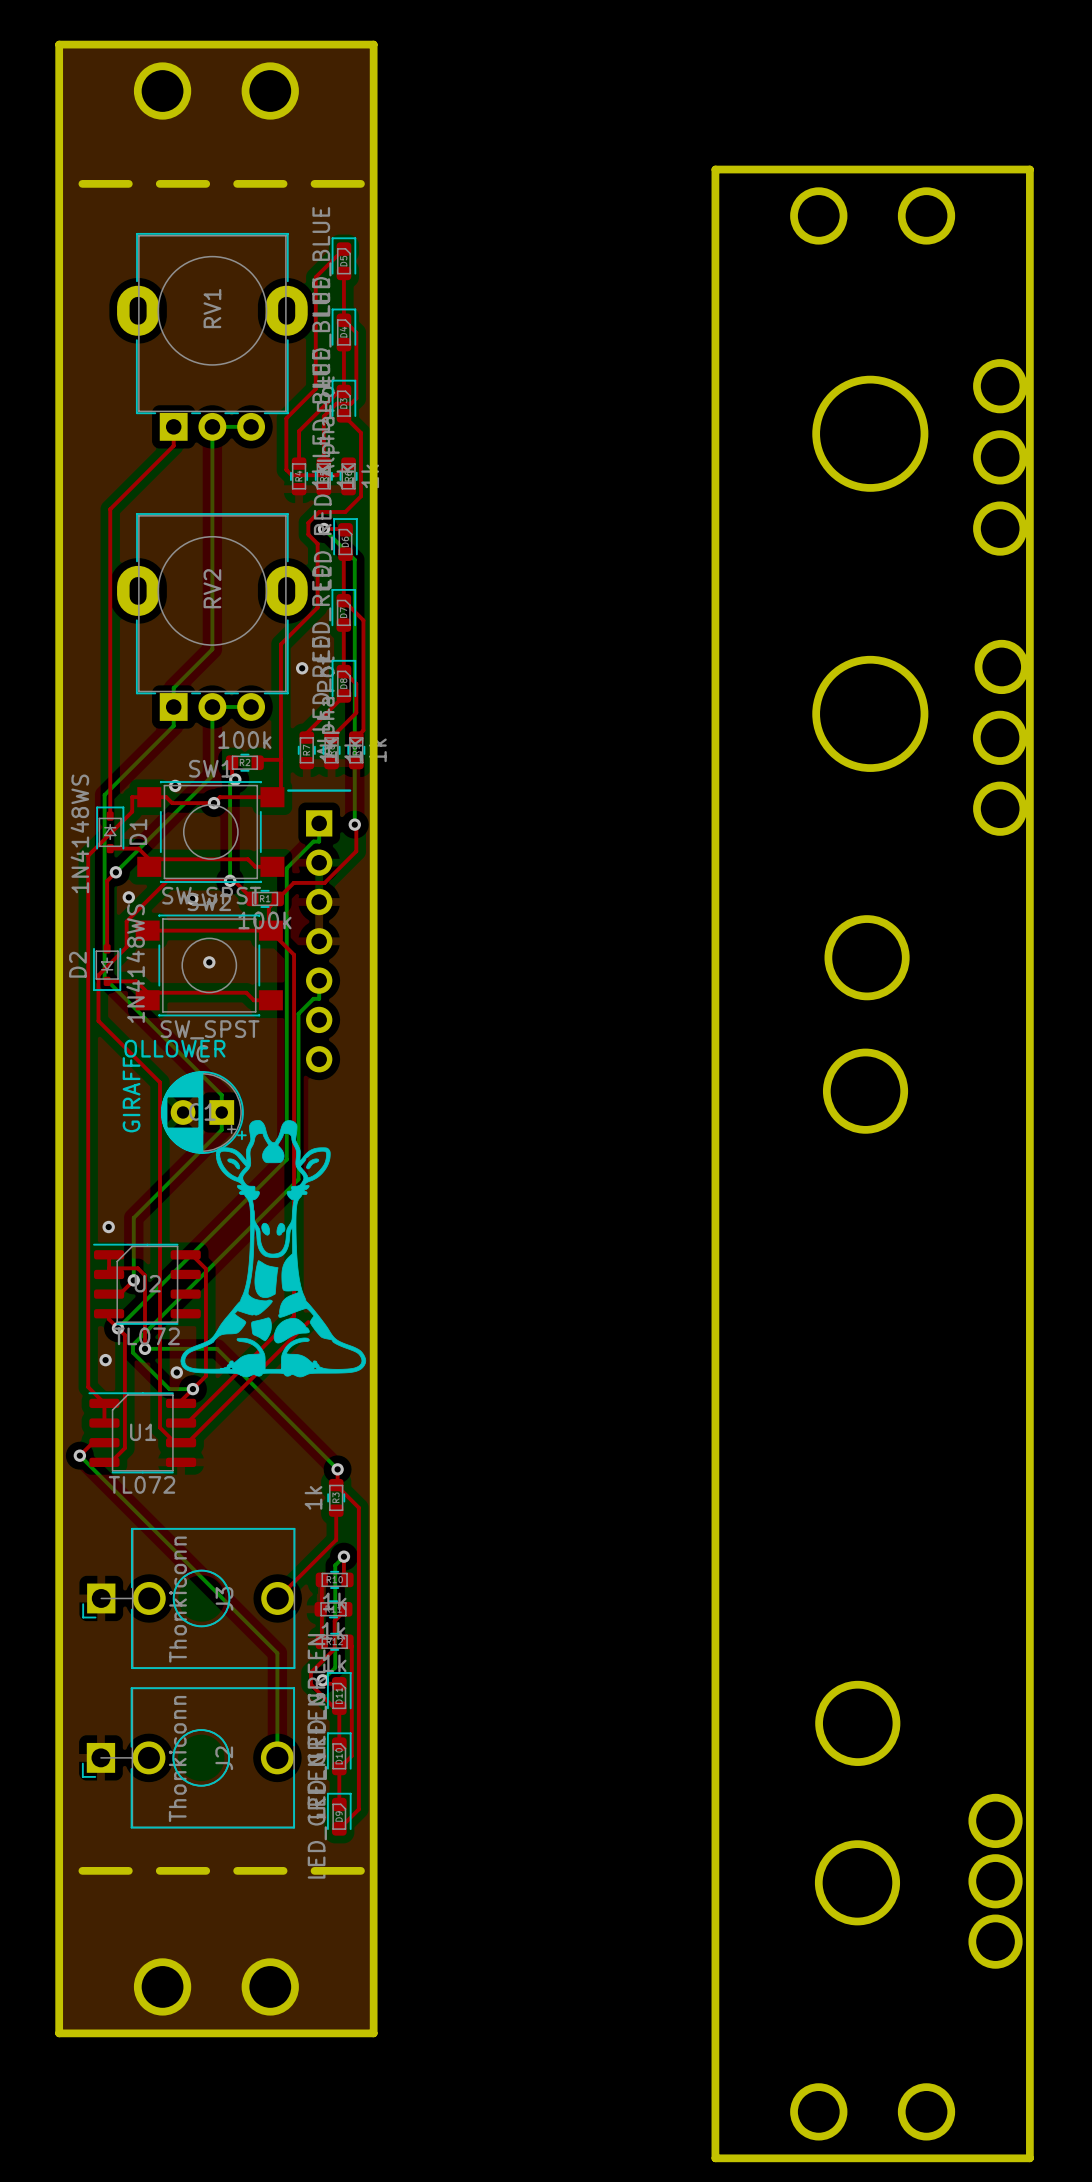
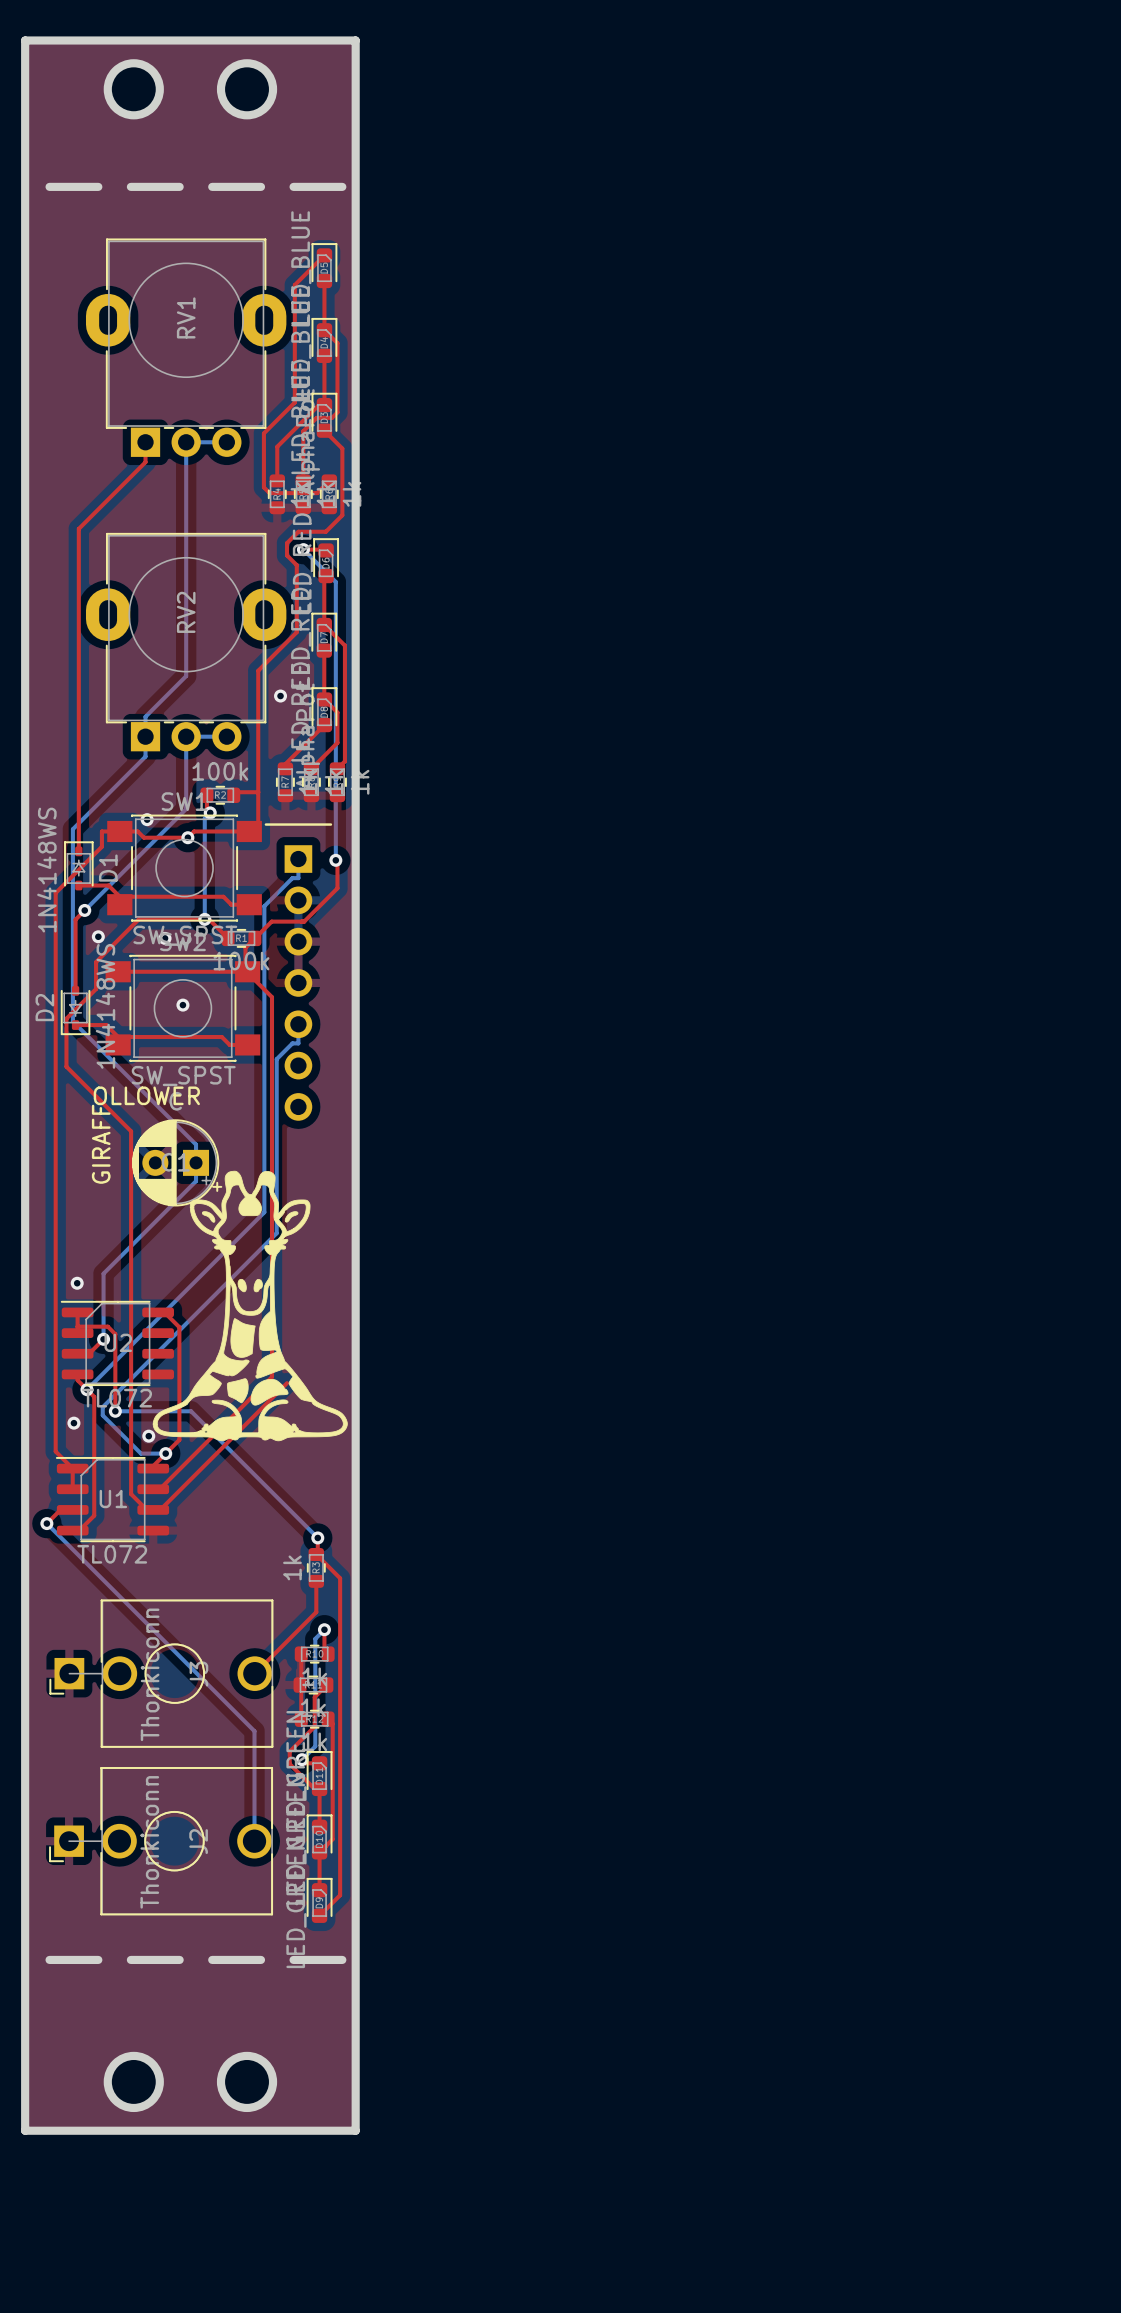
board edge: (715, 169) (1029, 169) (1029, 2158) (715, 2158) (715, 169) -> none
round board edge: [790, 187, 848, 245] -> none
round board edge: [897, 187, 956, 245] -> none
round board edge: [973, 359, 1028, 414] -> none
round board edge: [812, 375, 929, 492] -> none
round board edge: [973, 430, 1028, 485] -> none
round board edge: [973, 501, 1028, 556] -> none
round board edge: [974, 639, 1029, 695] -> none
round board edge: [812, 655, 929, 772] -> none
round board edge: [972, 710, 1028, 765] -> none
round board edge: [973, 781, 1028, 836] -> none
round board edge: [824, 915, 910, 1001] -> none
round board edge: [822, 1048, 909, 1134] -> none
round board edge: [815, 1680, 901, 1766] -> none
round board edge: [968, 1793, 1023, 1849] -> none
round board edge: [814, 1840, 901, 1926] -> none
round board edge: [968, 1854, 1023, 1909] -> none
round board edge: [968, 1914, 1023, 1969] -> none
round board edge: [790, 2083, 848, 2141] -> none
round board edge: [897, 2083, 956, 2141] -> none

